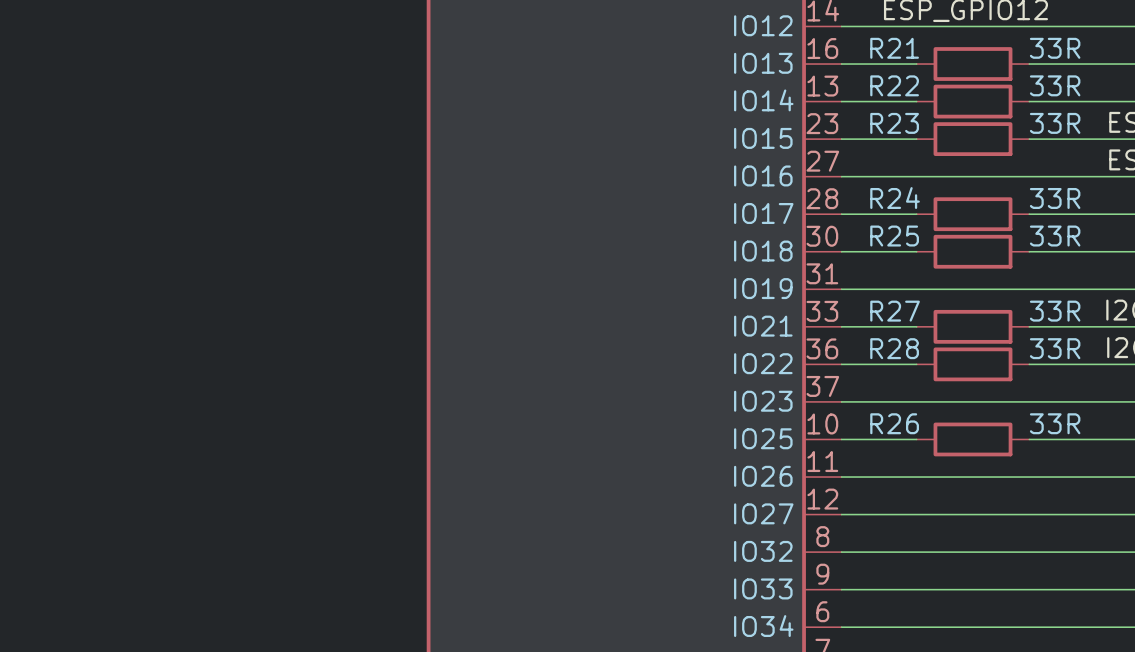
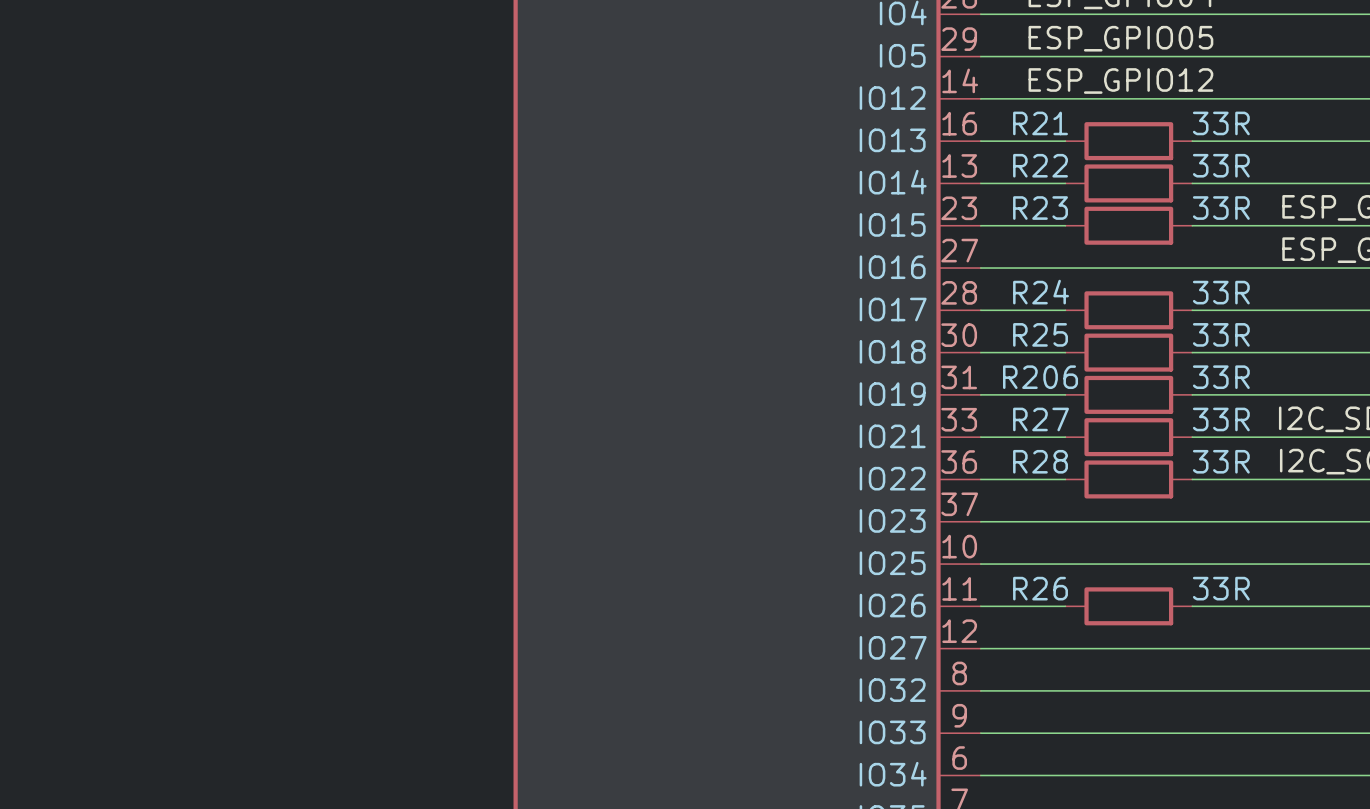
wire: (916, 289) (1029, 289) -> none
R206: none -> 33R (1128, 394)
R26 position: (972, 439) -> (1128, 606)
wire: (916, 477) (1029, 477) -> (1065, 564) (1192, 564)

